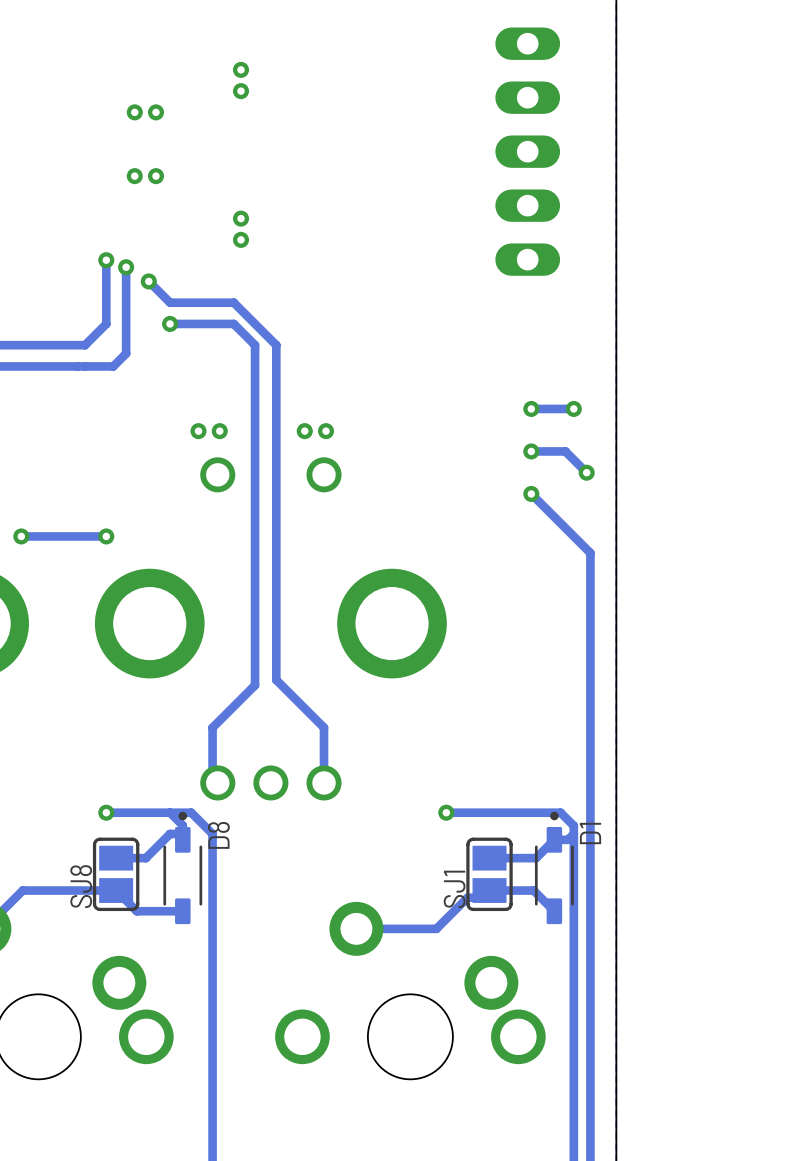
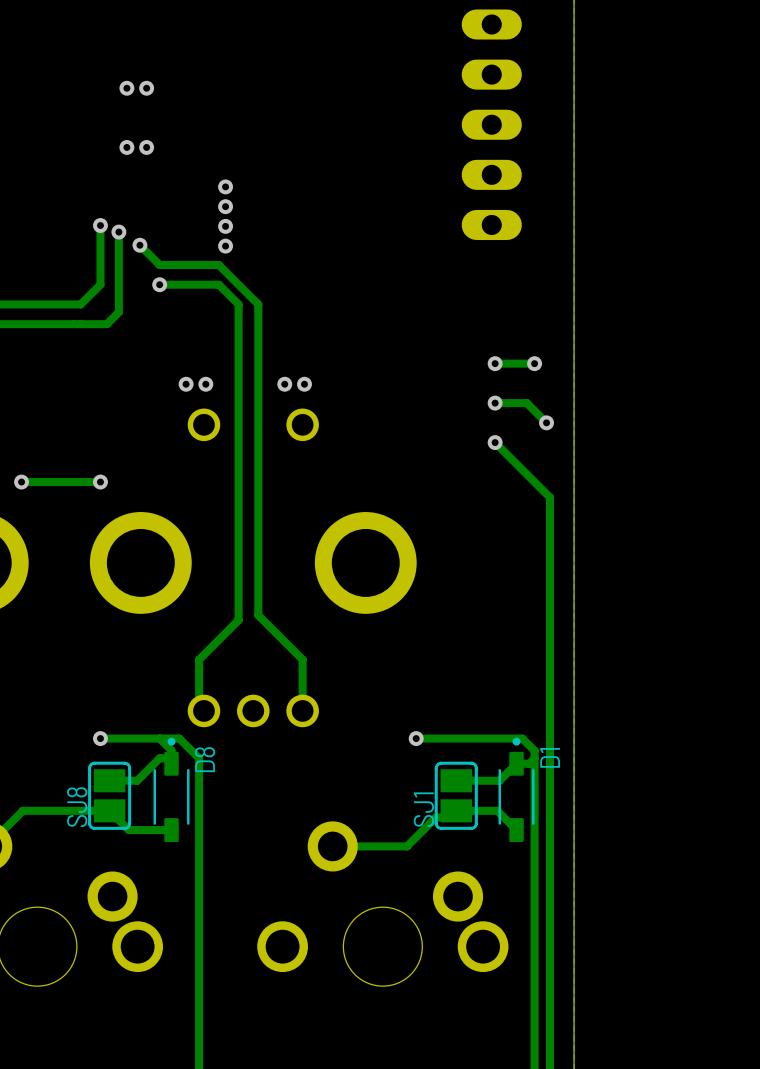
via: (241, 69) -> none
via: (241, 91) -> none
via: none -> (225, 226)
via: none -> (225, 246)

